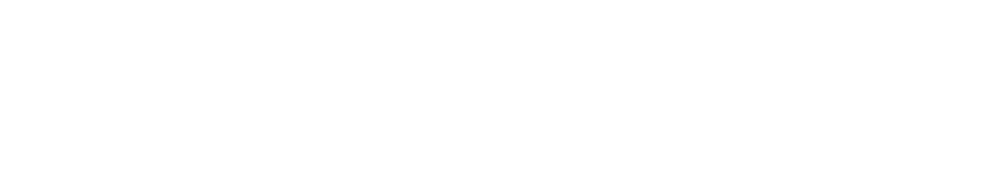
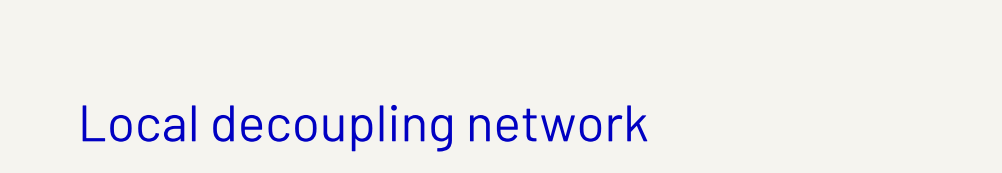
text: none -> Local decoupling network (364, 128)

